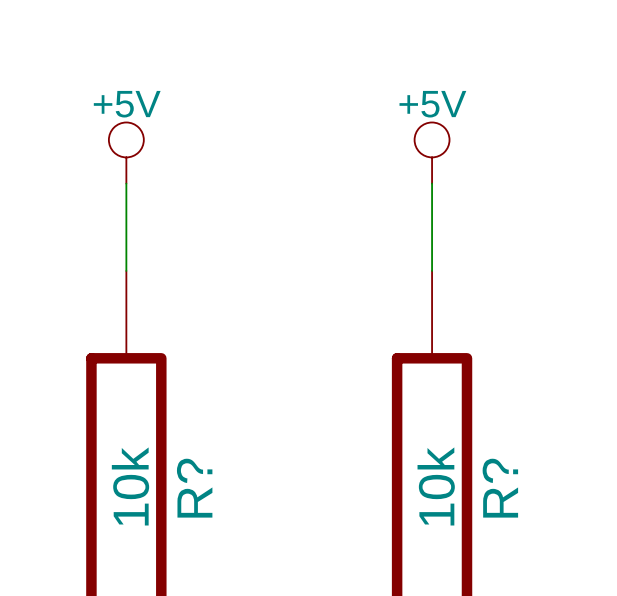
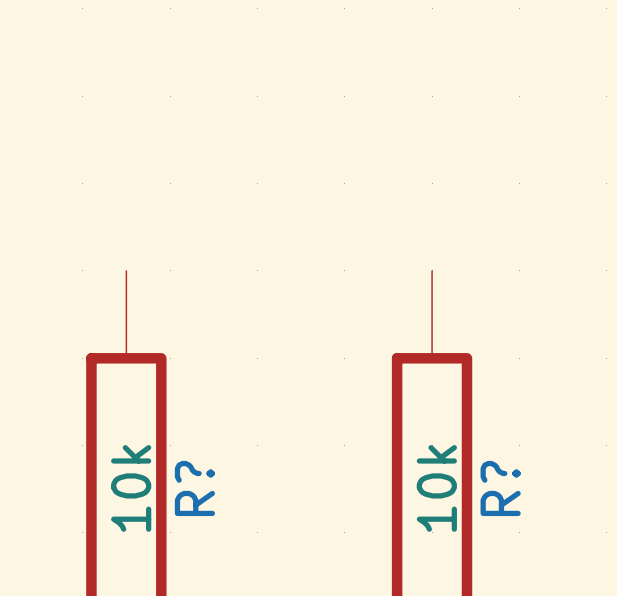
power symbol: +5V (126, 153) -> none
power symbol: +5V (432, 153) -> none
wire: (126, 183) (126, 270) -> none
wire: (432, 183) (432, 270) -> none

